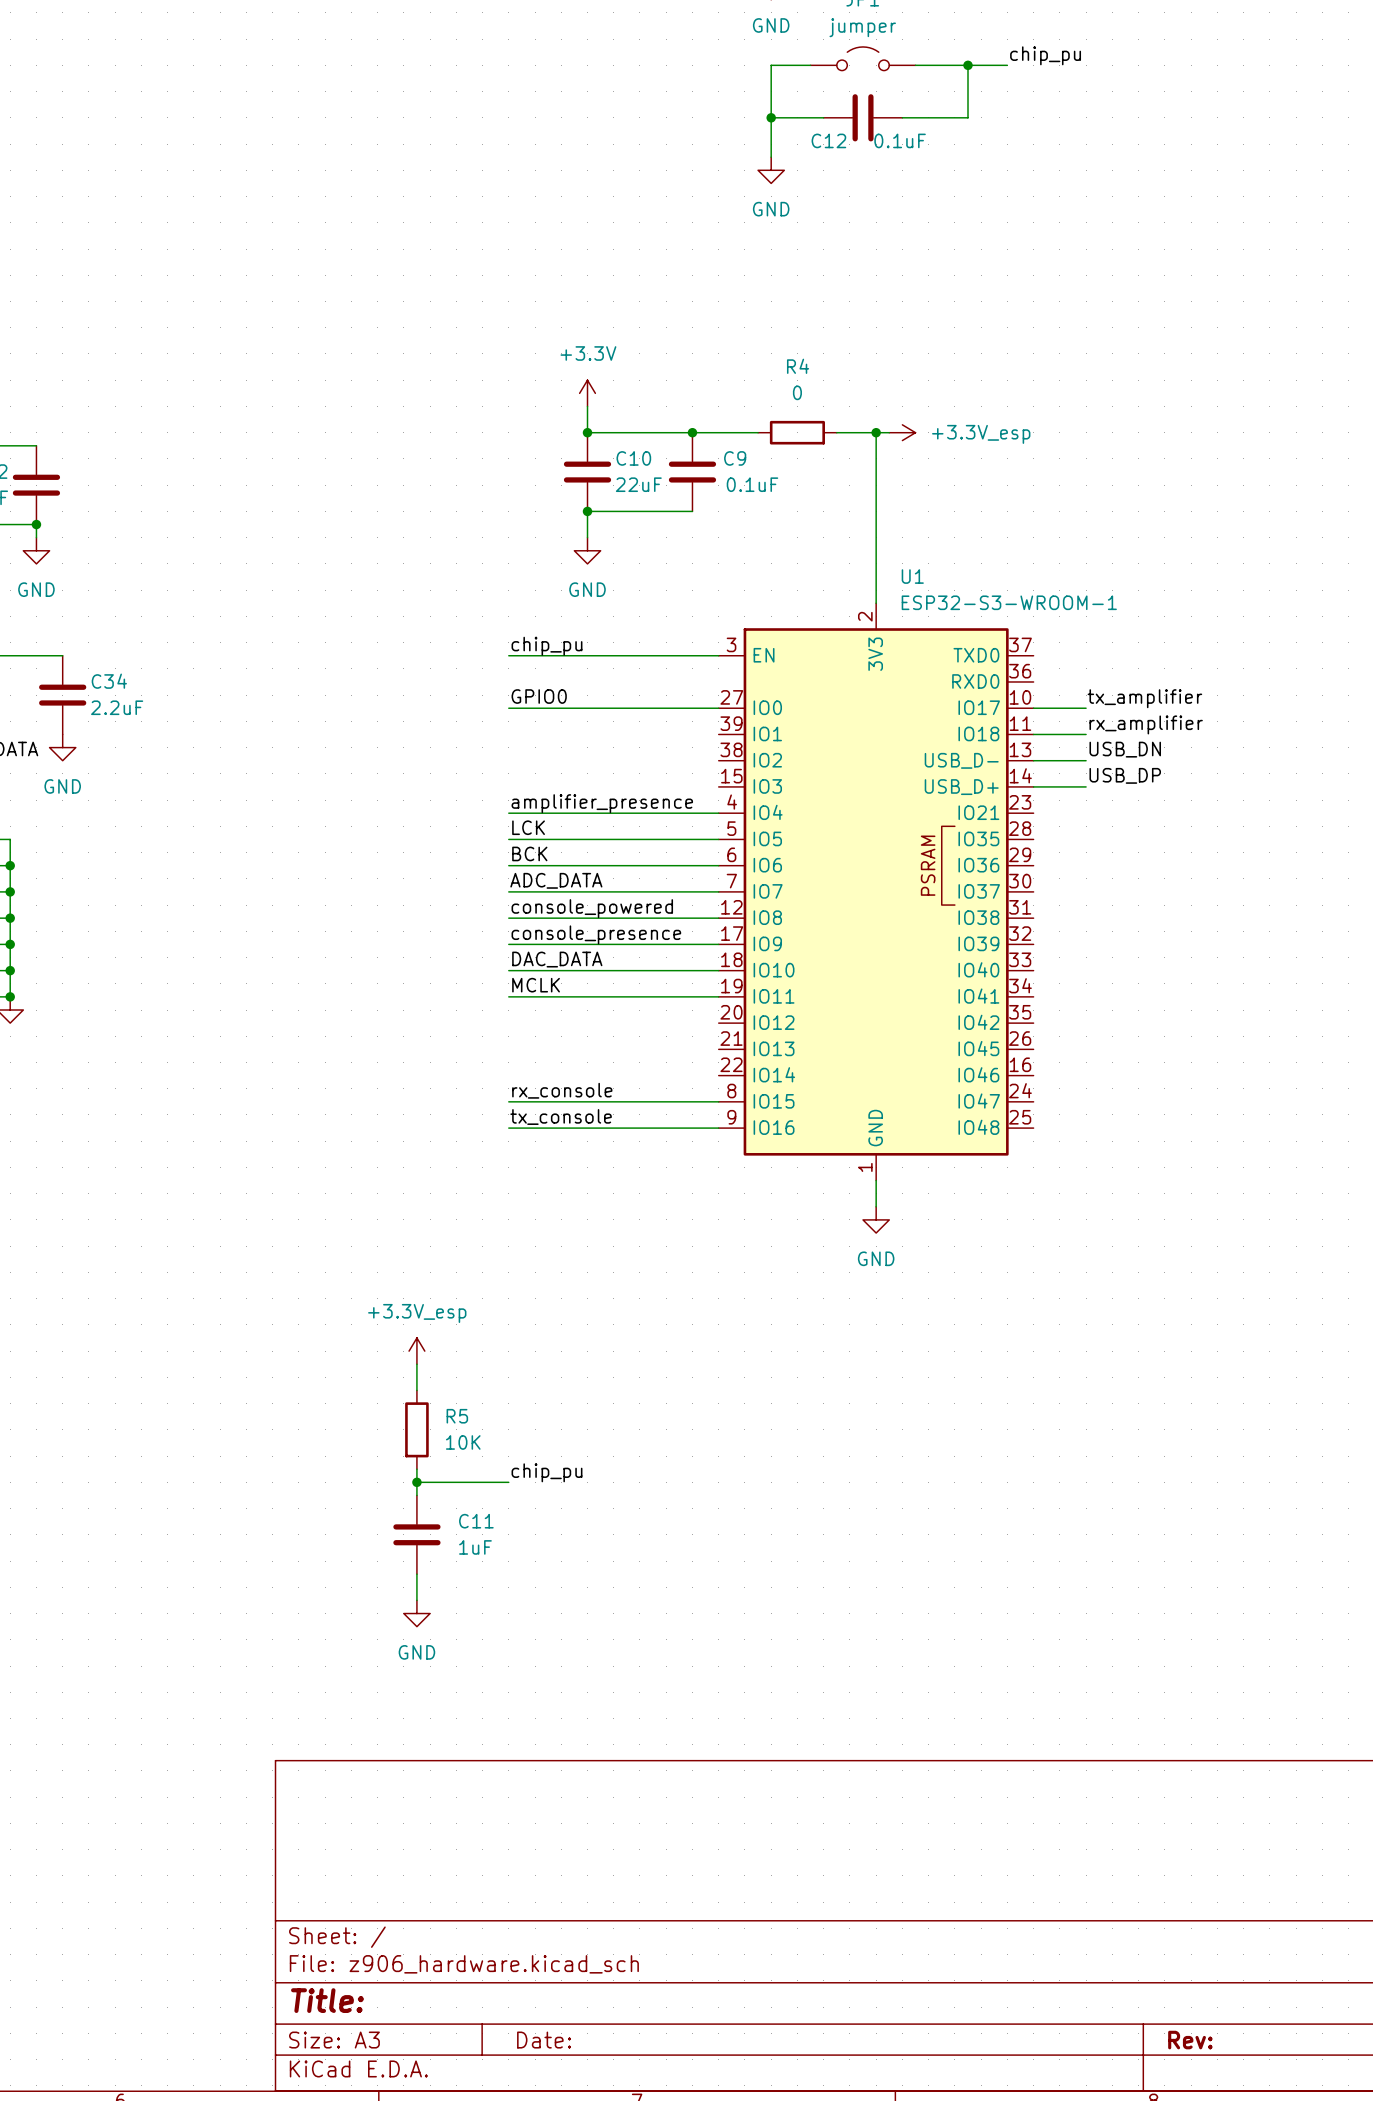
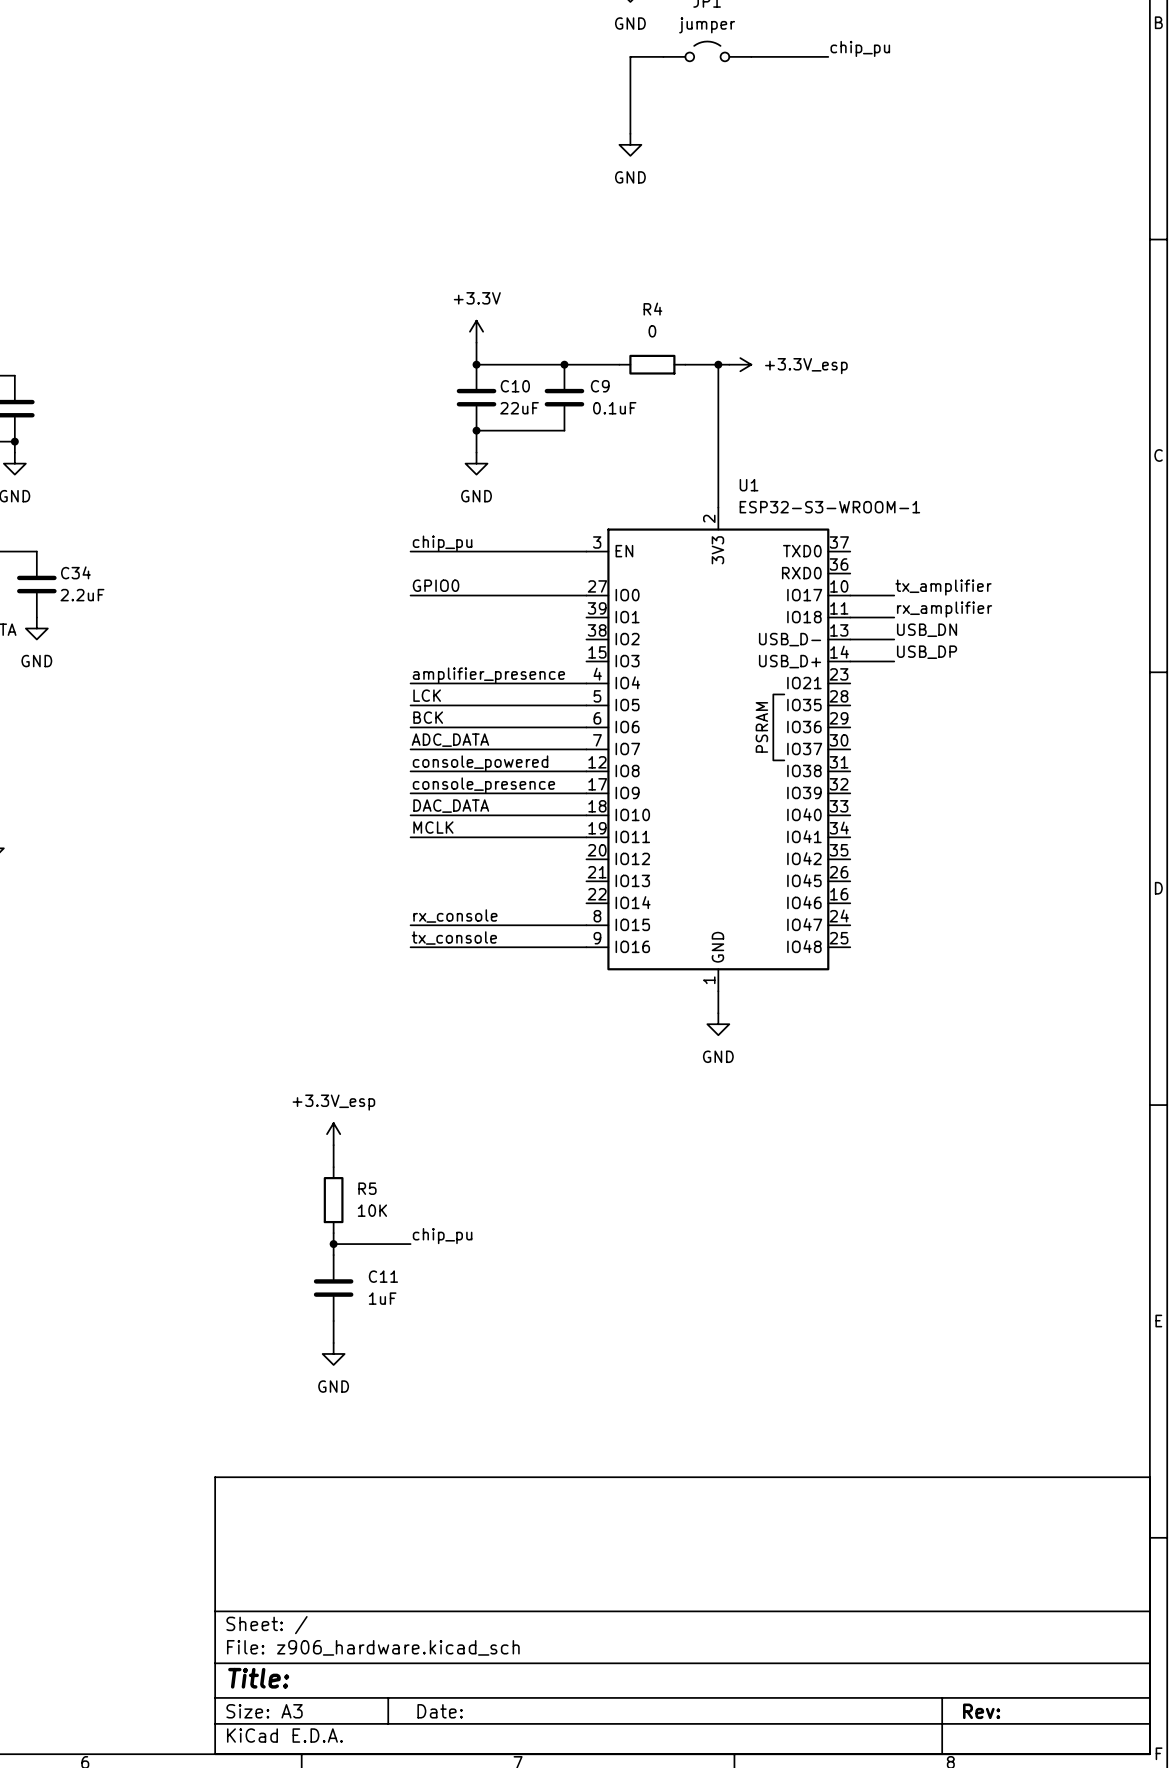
wire: (967, 65) (967, 117) (902, 117) -> none
junction: (967, 65) -> none
wire: (771, 117) (823, 117) -> none
junction: (771, 117) -> none
C12: 0.1uF (863, 117) -> none

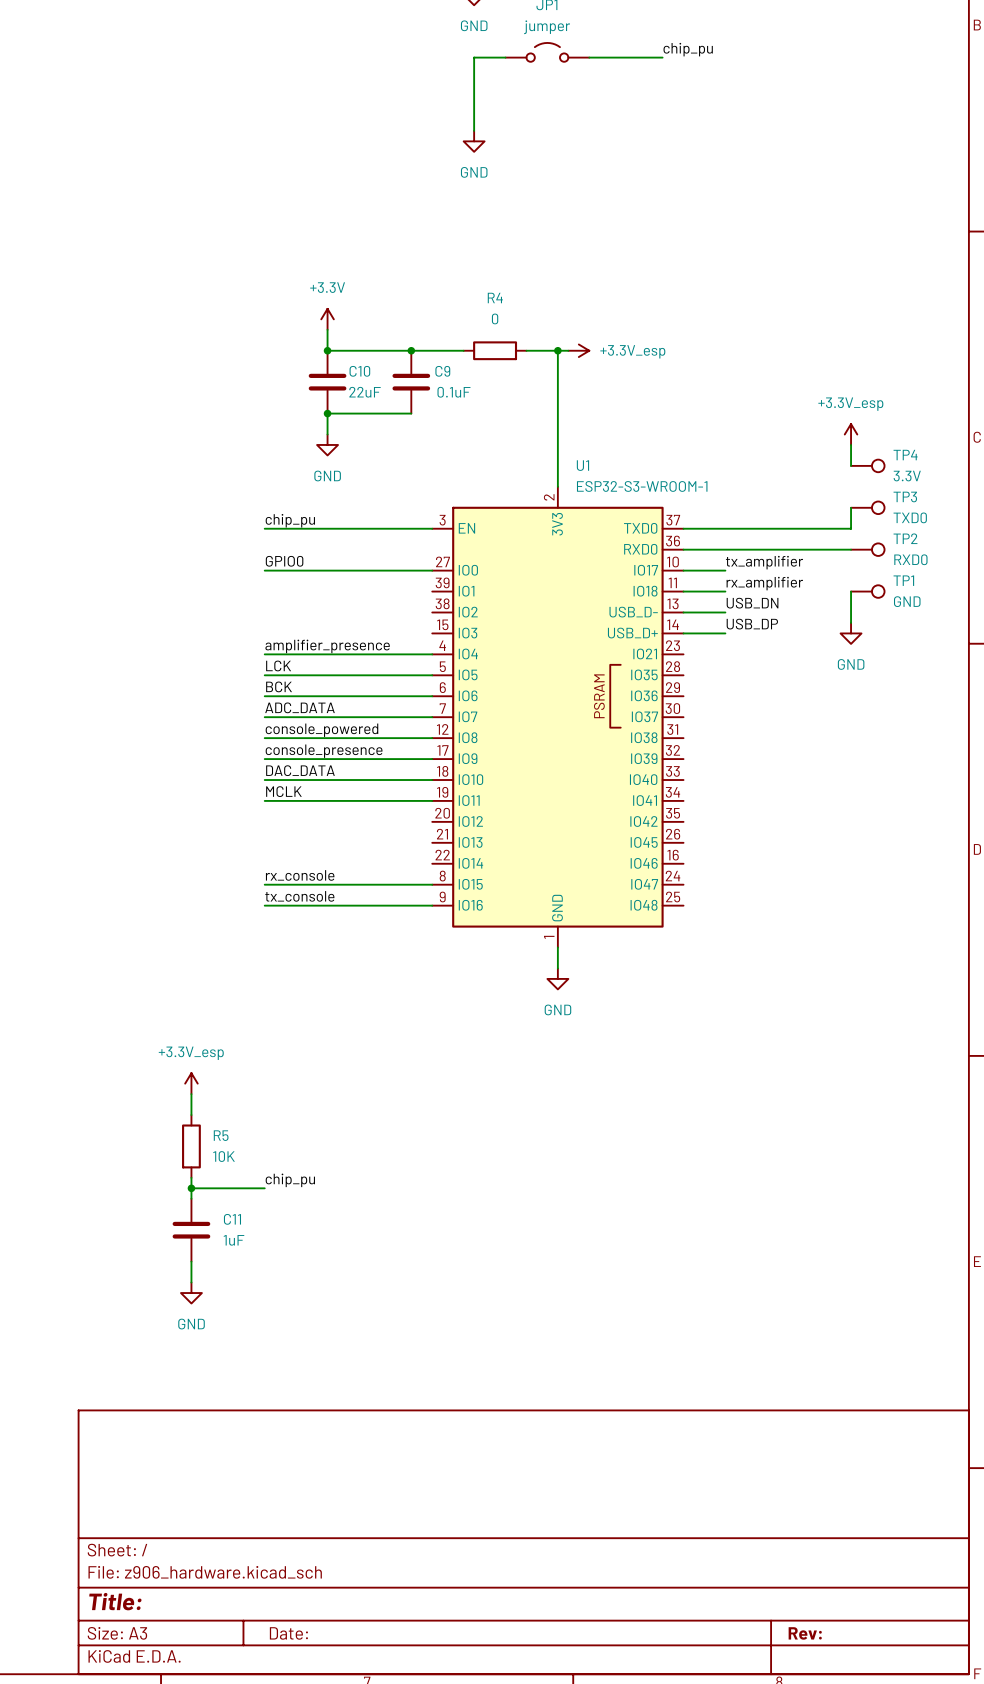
power symbol: none -> +3.3V_esp (851, 434)
wire: none -> (851, 444) (851, 465)
TP4: none -> 3.3V (867, 465)
wire: none -> (851, 507) (851, 528) (683, 528)
TP3: none -> TXD0 (867, 507)
wire: none -> (683, 549) (851, 549)
TP2: none -> RXD0 (867, 549)
wire: none -> (851, 591) (851, 622)
TP1: none -> GND (867, 591)
power symbol: none -> GND (851, 633)

